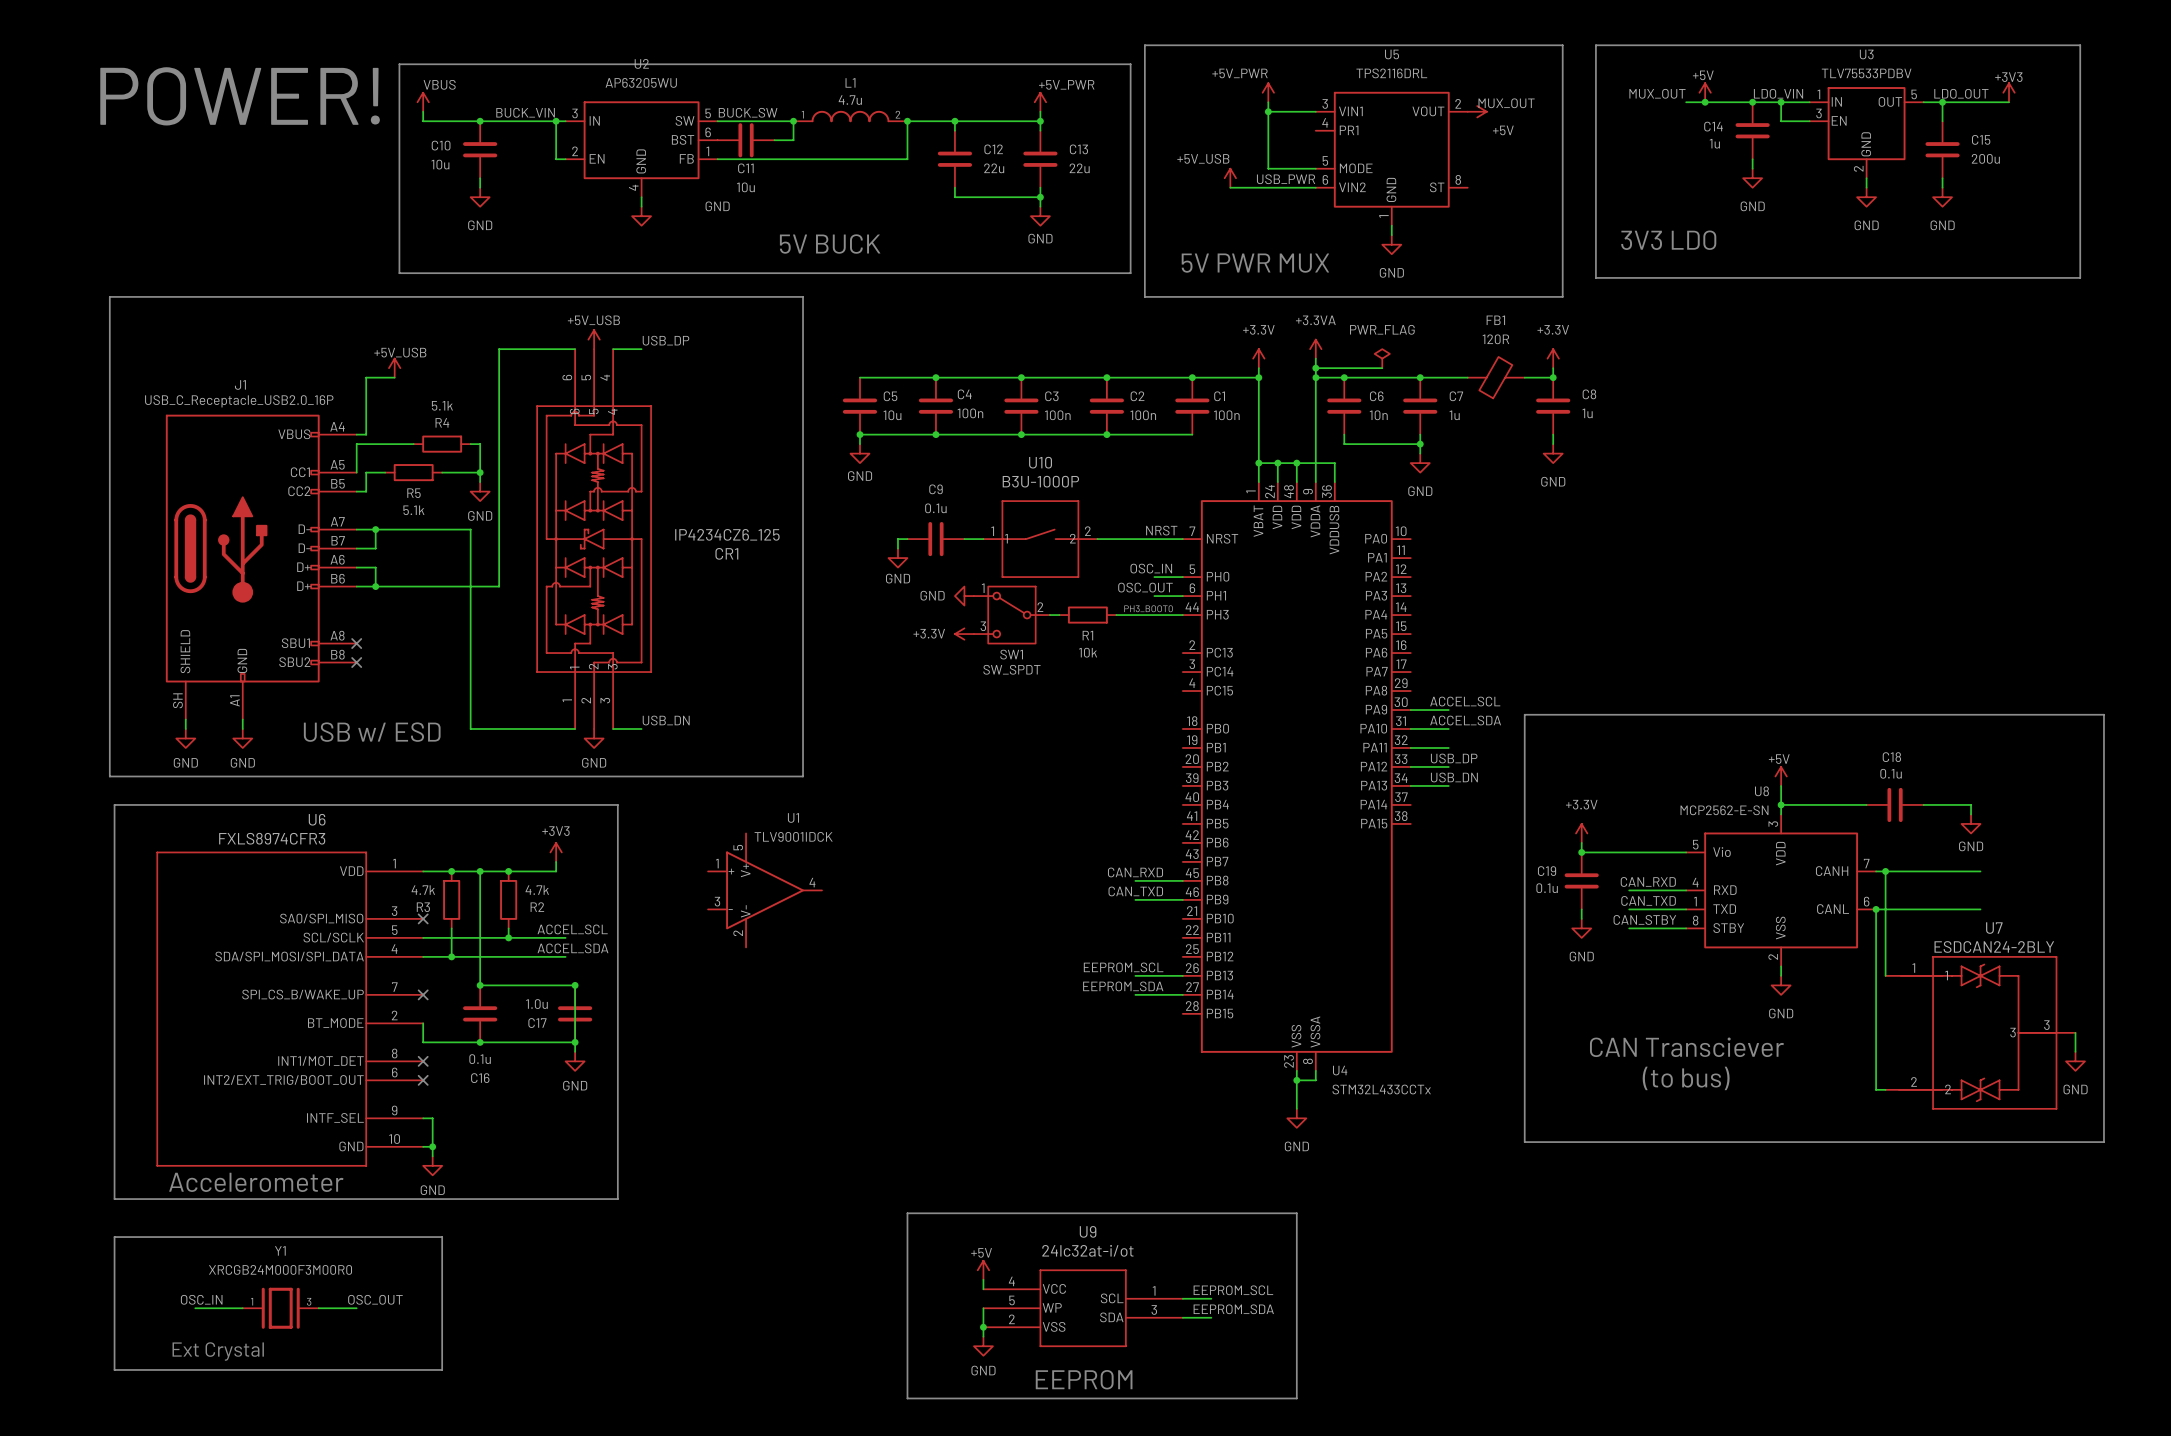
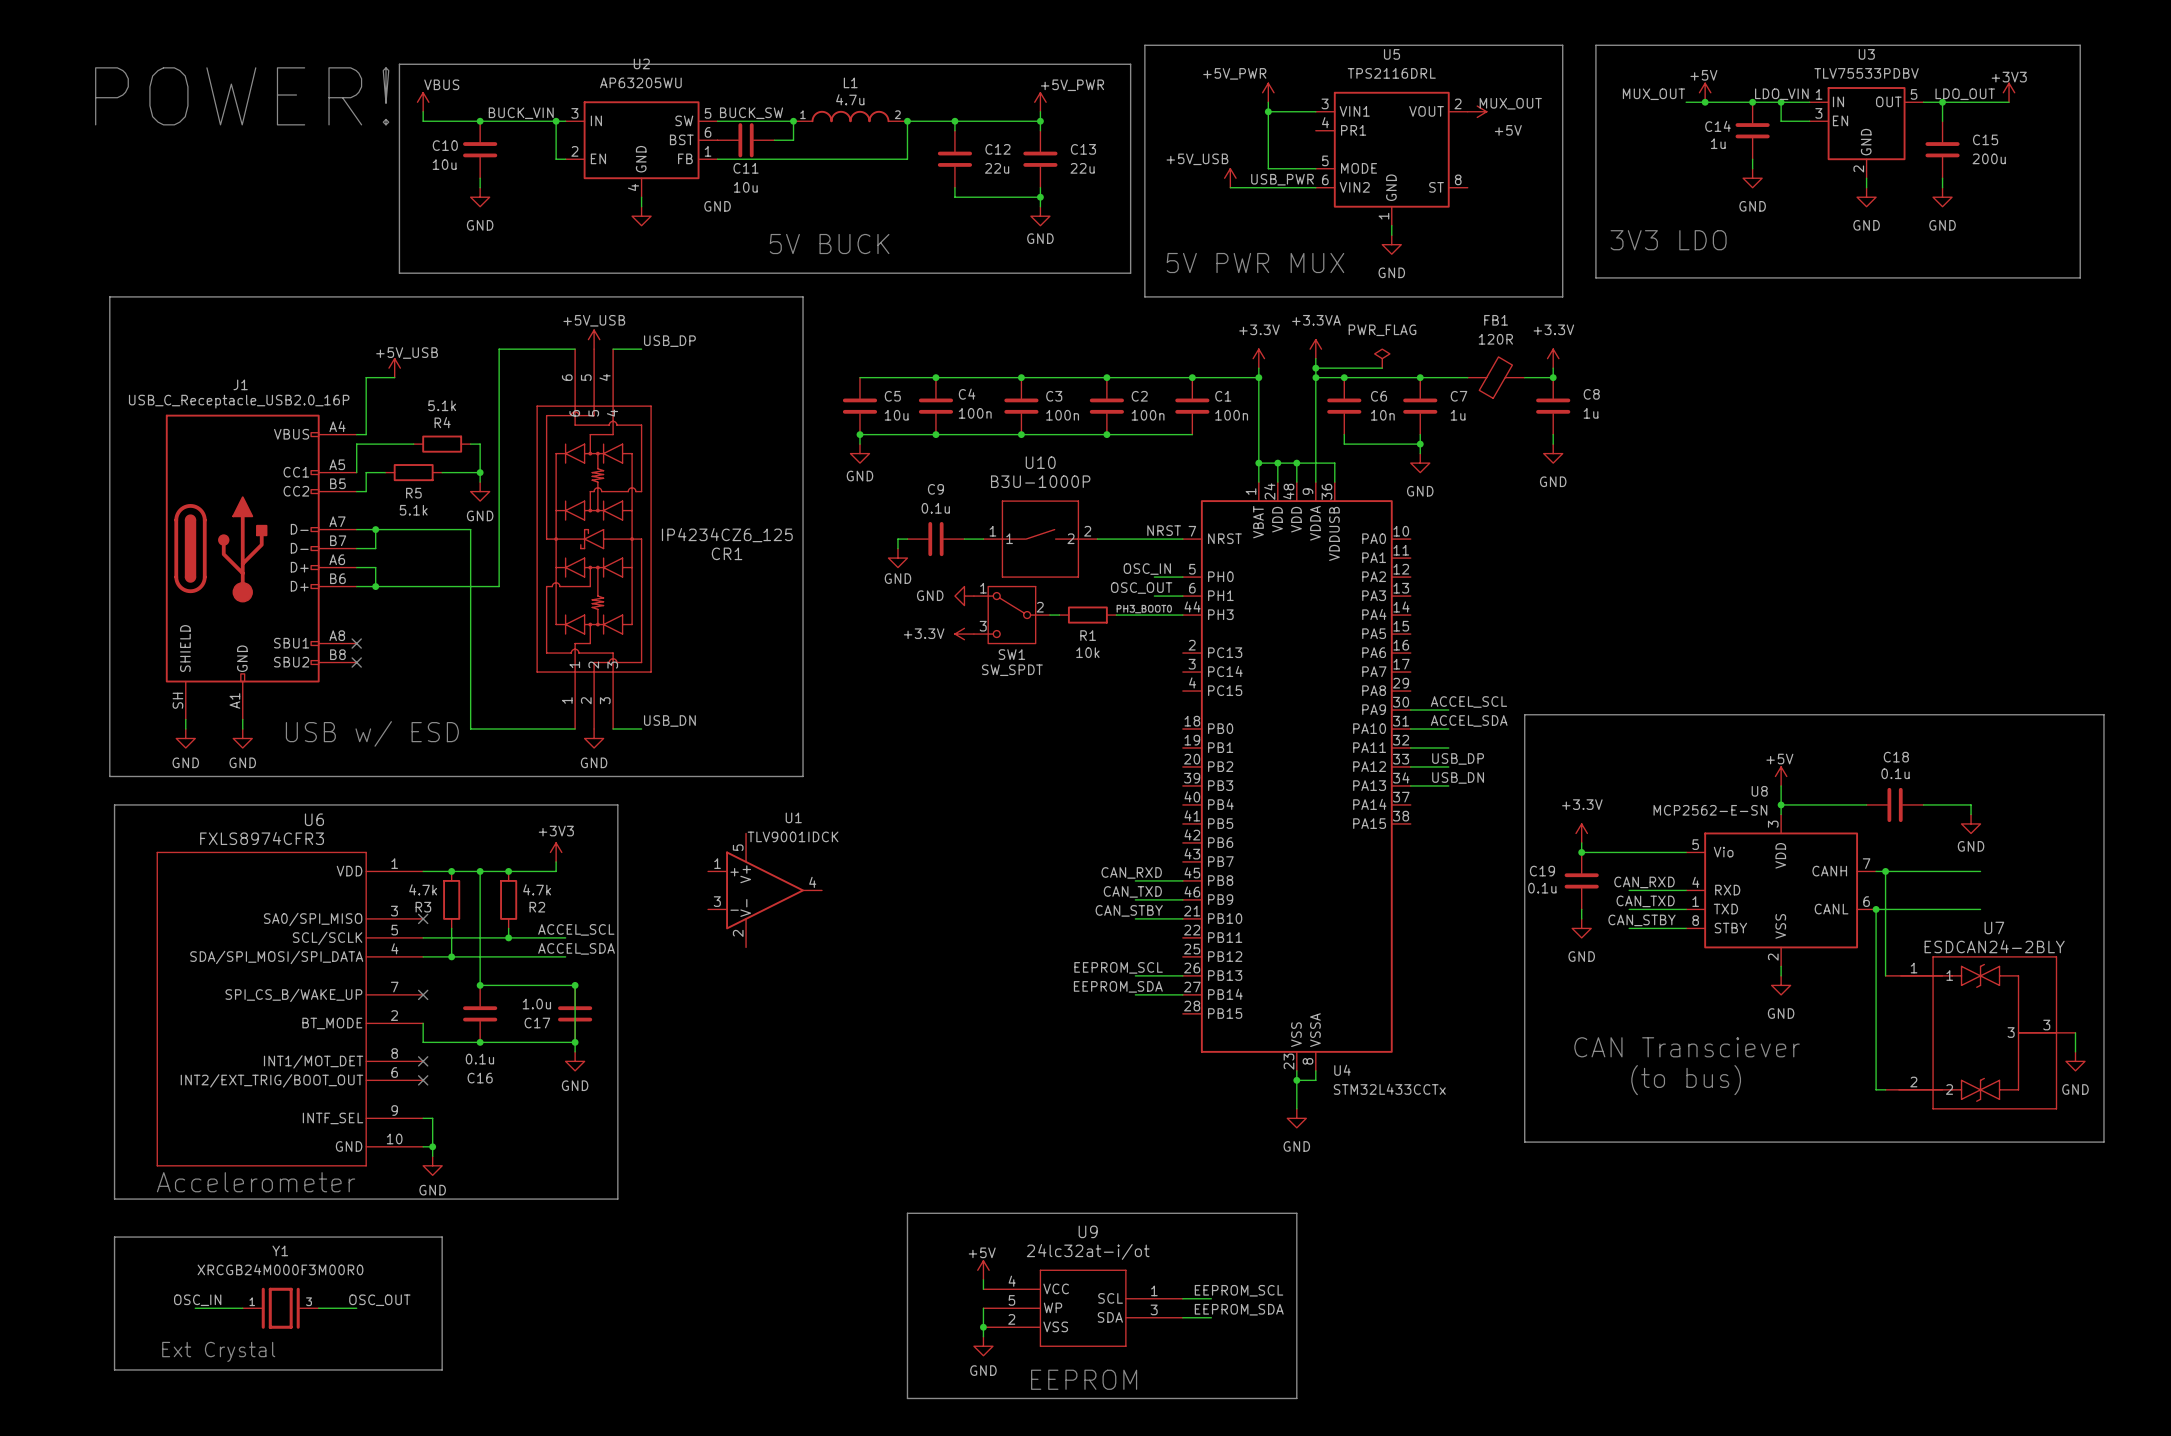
label: none -> CAN_STBY (1129, 910)
wire: none -> (1135, 918) (1182, 918)

